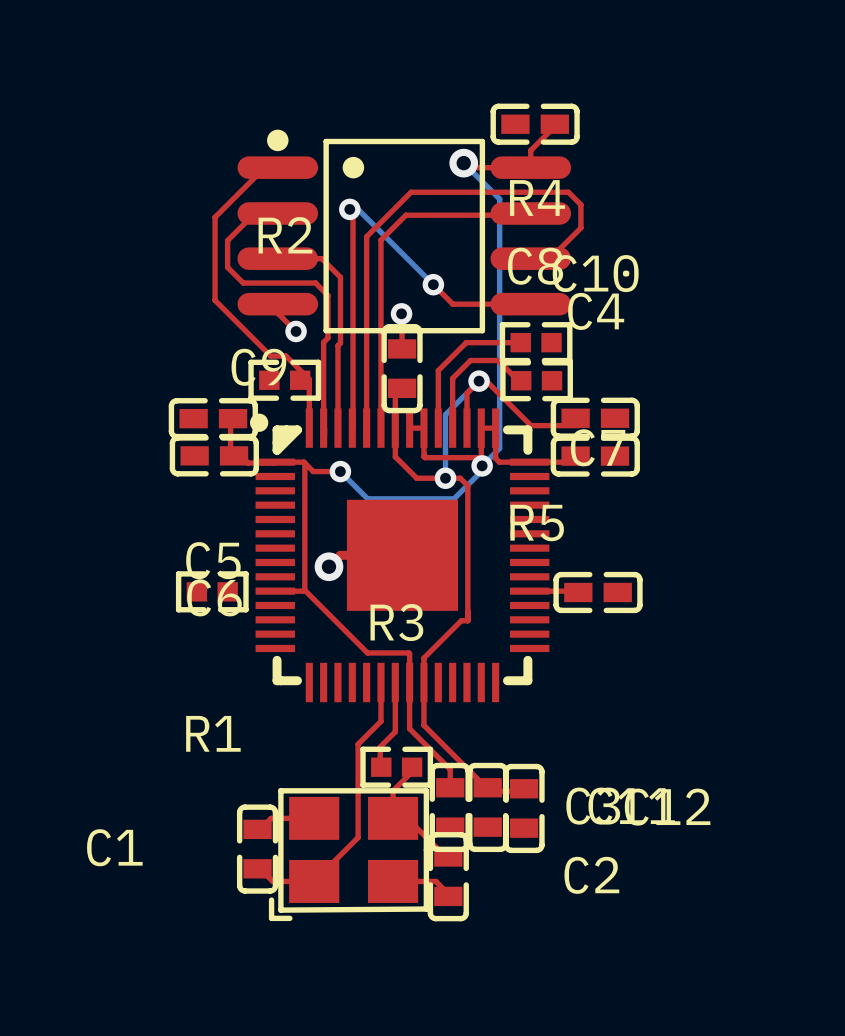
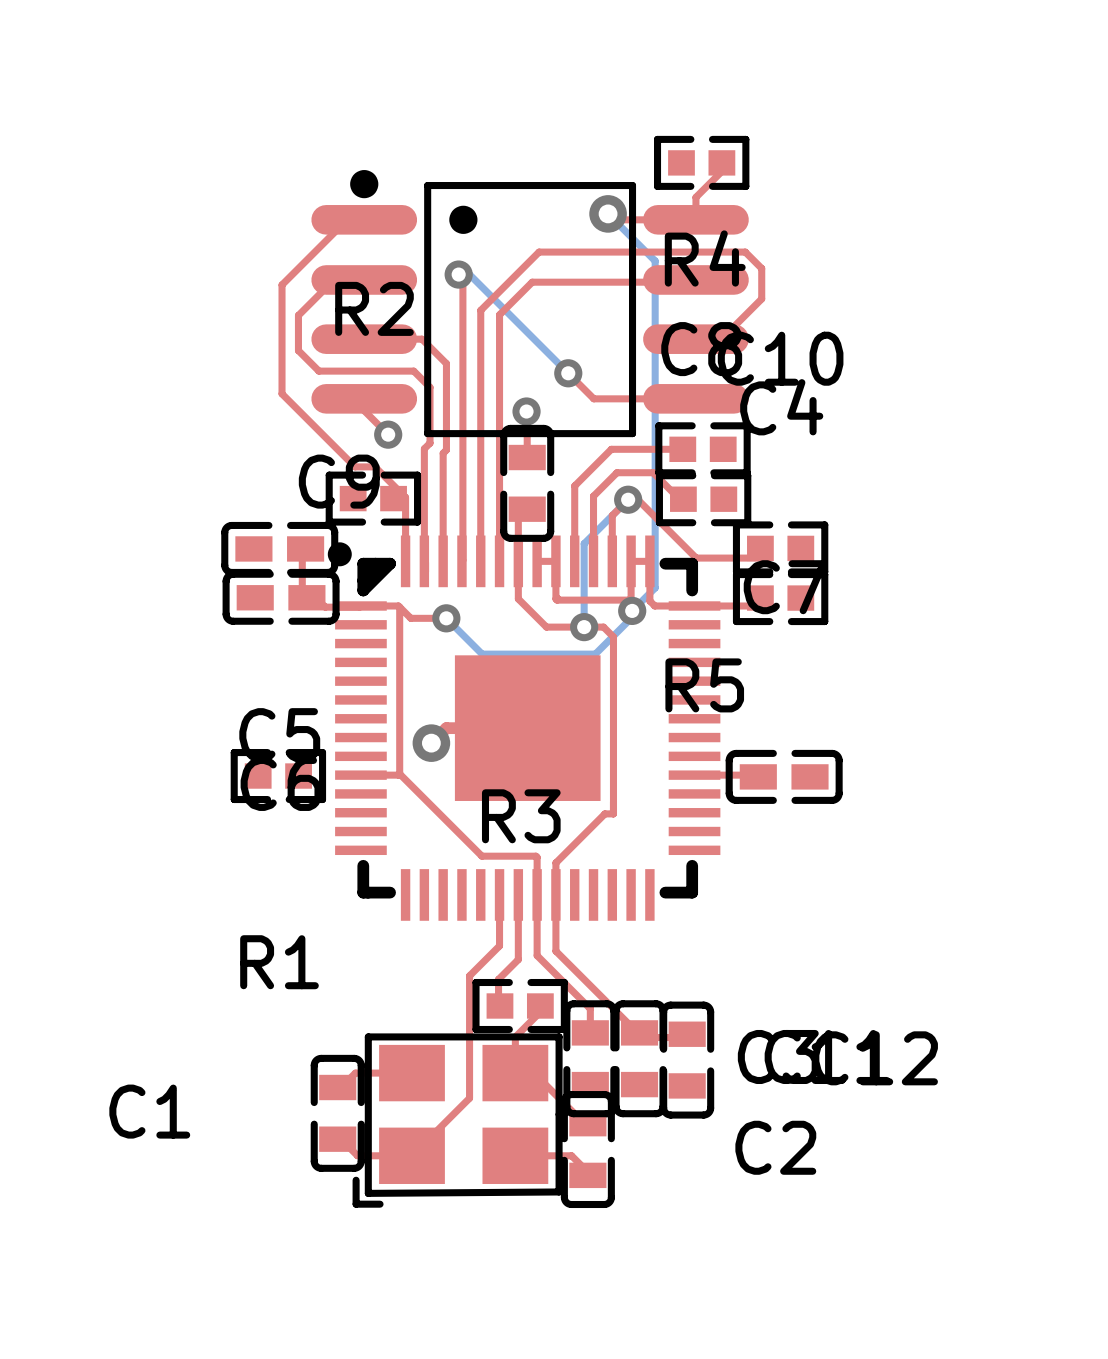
C8 footprint: [490, 103, 580, 145] -> [654, 135, 750, 190]
C10 footprint: [550, 397, 640, 439] -> [732, 521, 829, 576]
C4 footprint: [550, 435, 640, 477] -> [732, 571, 829, 626]

